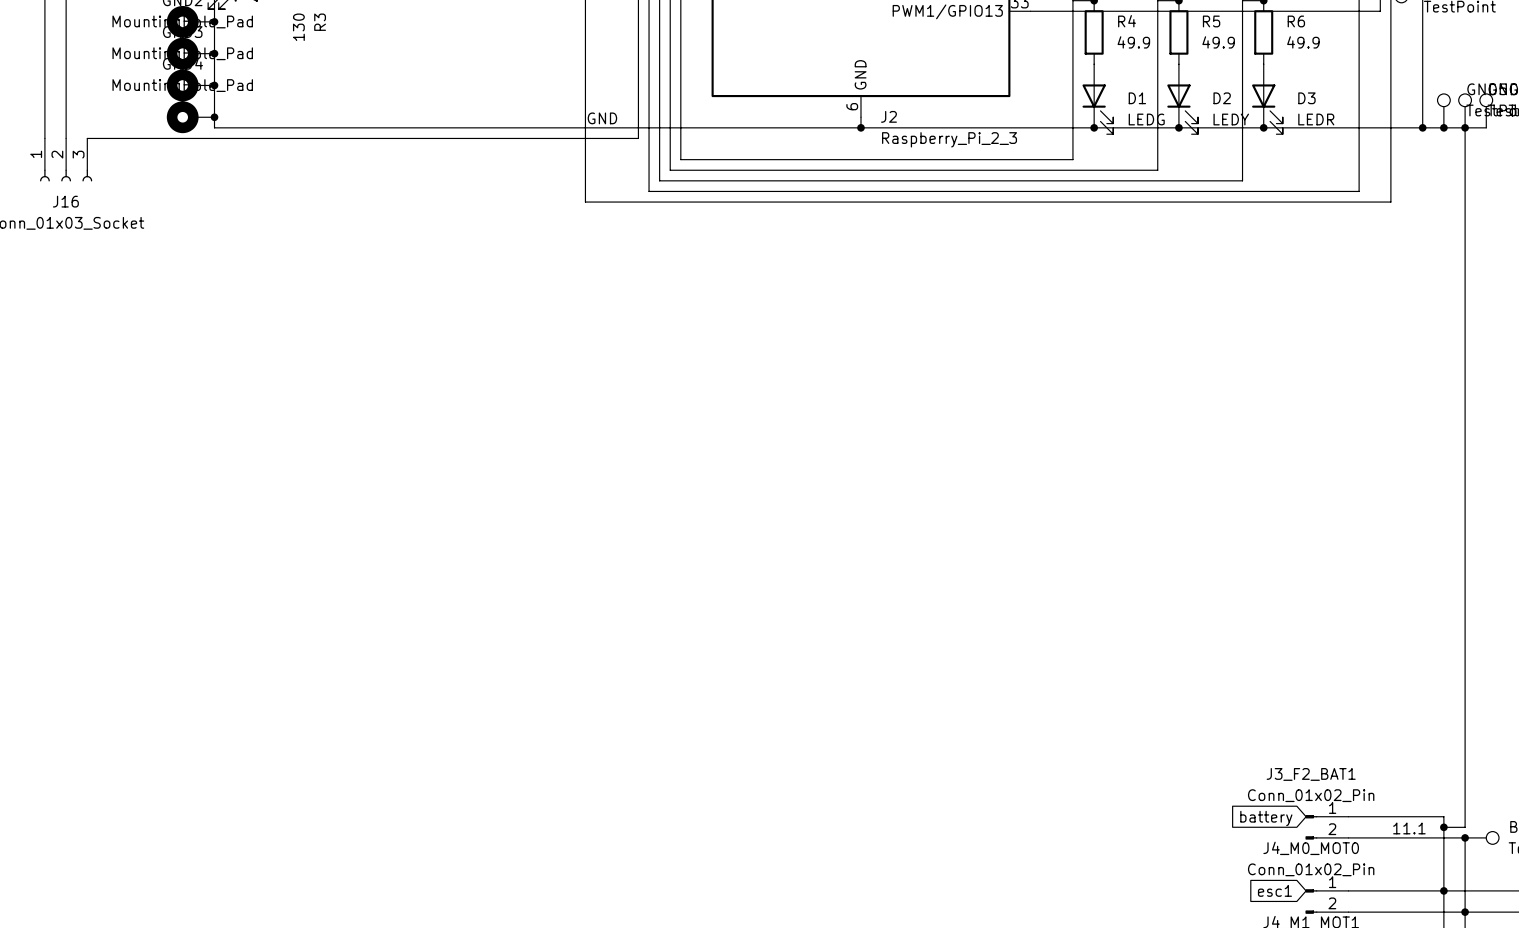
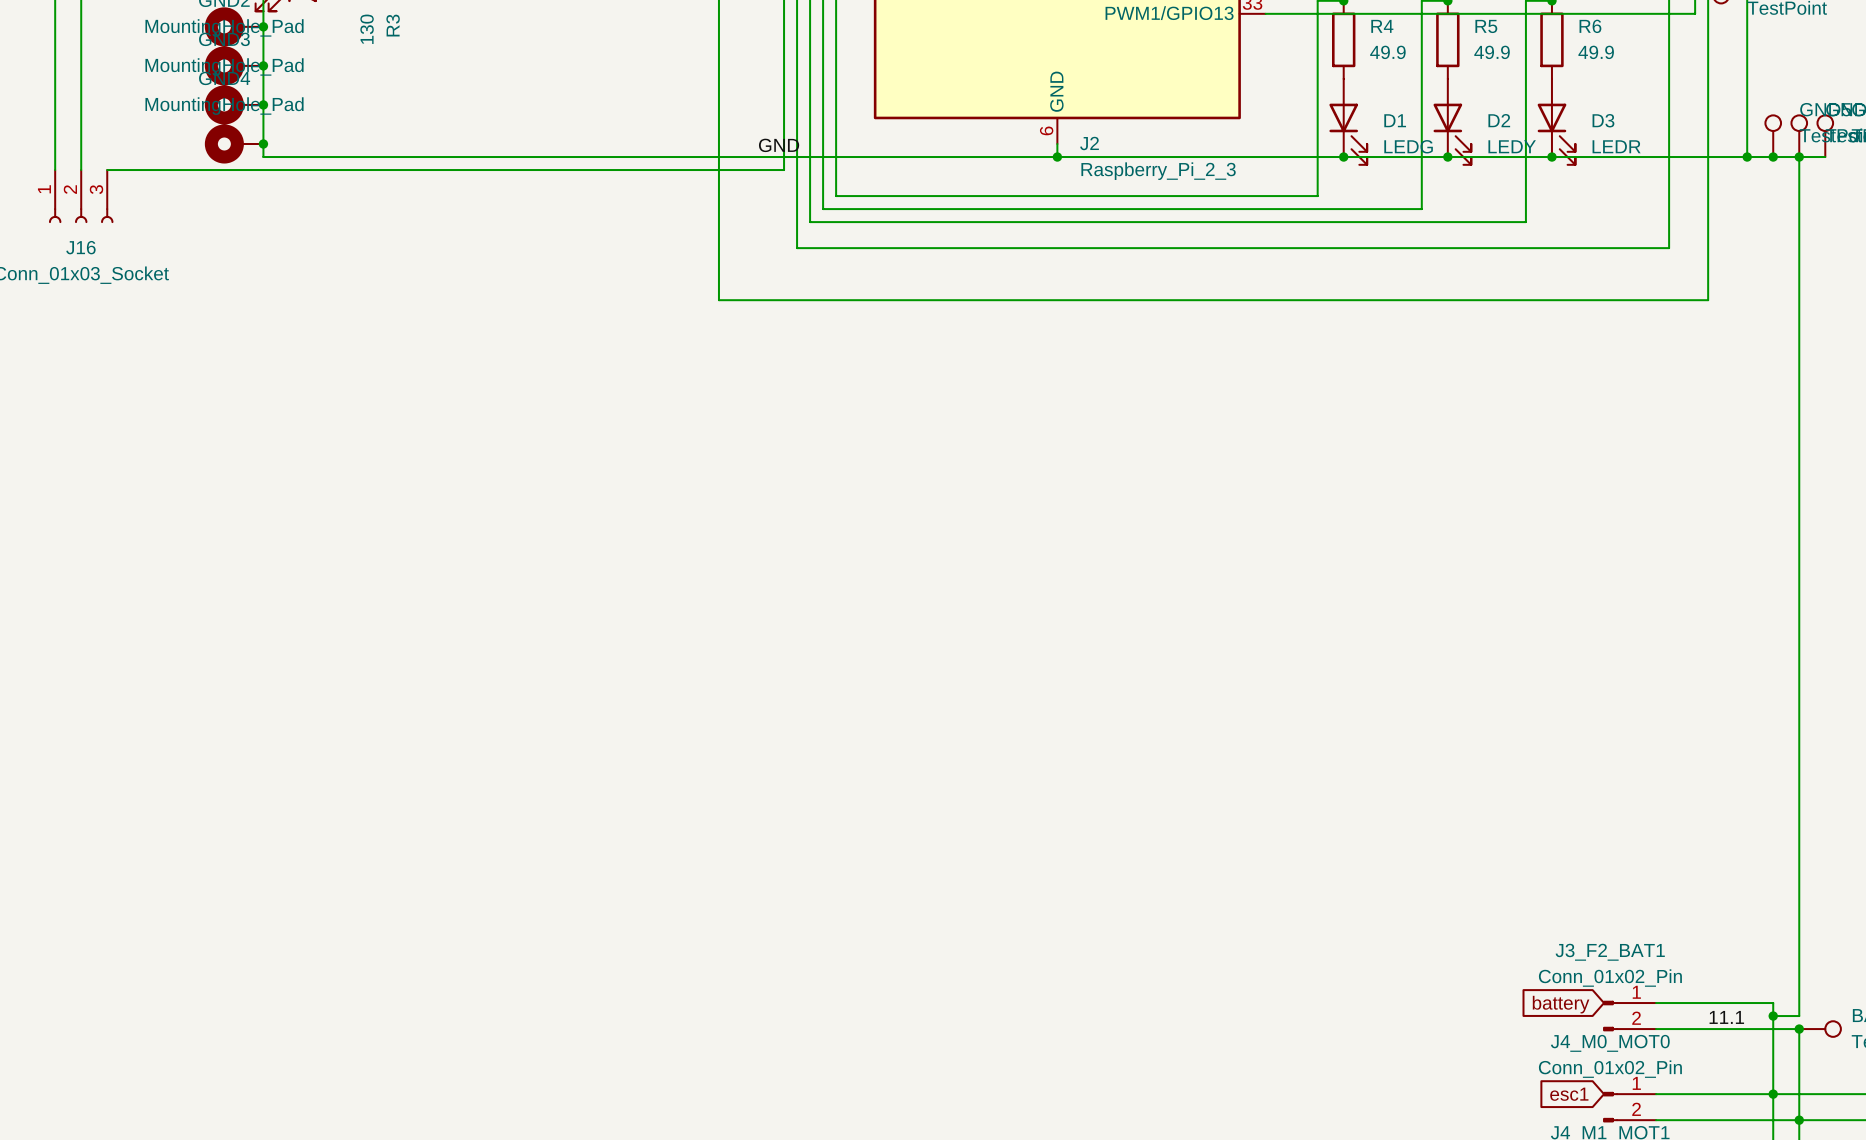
label position: GND (602, 118) -> GND (779, 145)
wire: (649, 191) (1359, 191) -> none
wire: (585, 202) (649, 202) -> (797, 235) (797, 248)
wire: none -> (718, 248) (718, 300) (1708, 300) (1708, 248)
wire: (1359, 202) (1390, 202) -> (1669, 248) (1669, 235)

